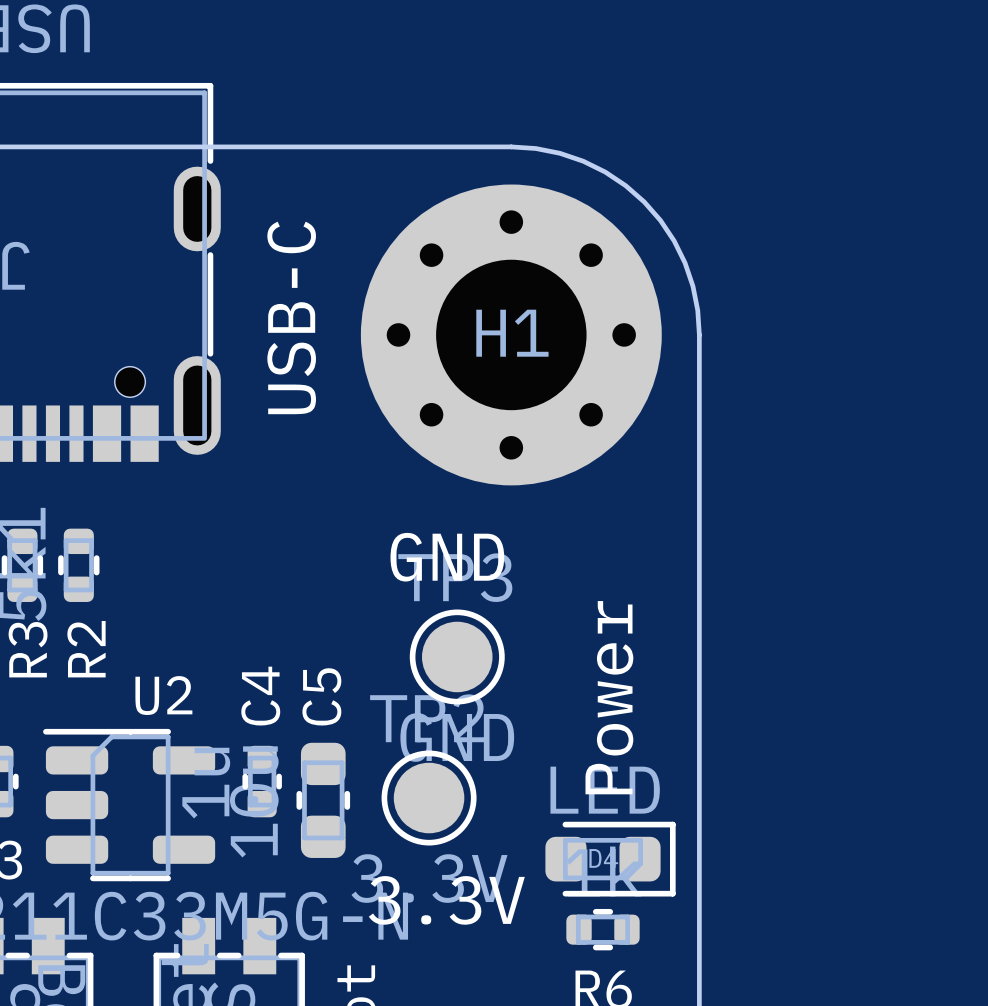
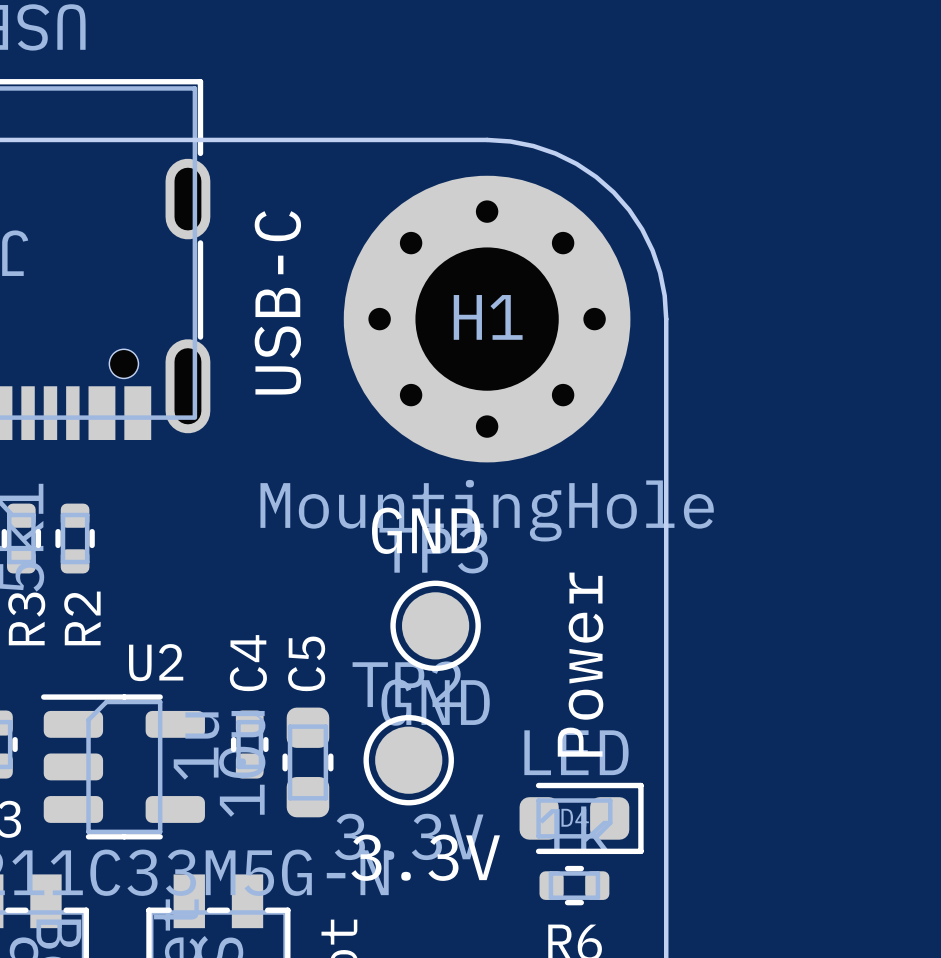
H1 value: none -> MountingHole (487, 510)

